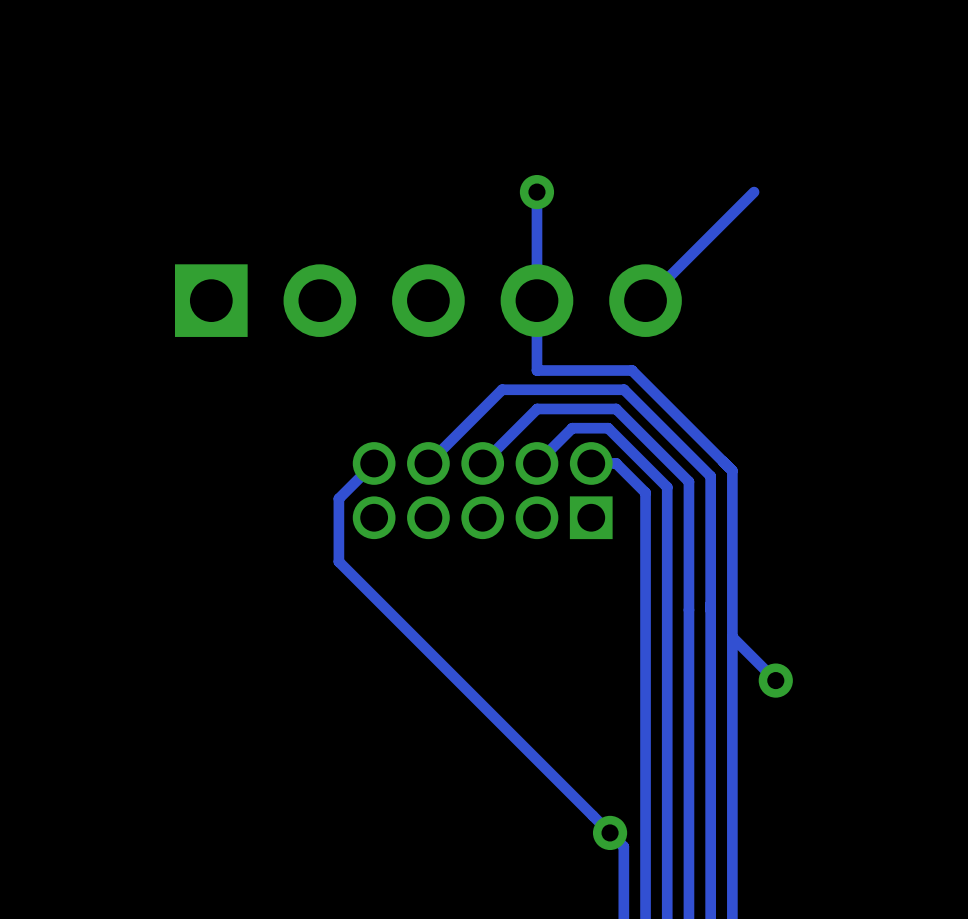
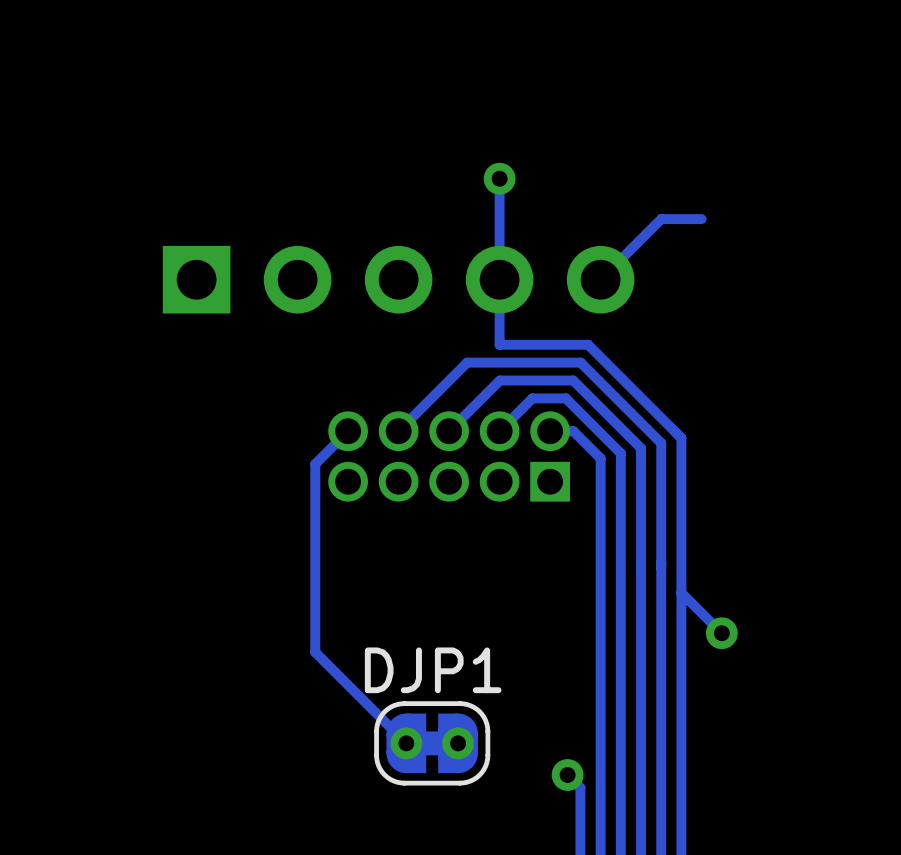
track: (754, 192) (710, 235) -> (701, 219) (661, 219)
track: (338, 561) (610, 832) -> (315, 522) (315, 652) (406, 743)
via: none -> (406, 743)
DJP1: none -> (432, 743)
via: none -> (458, 743)

